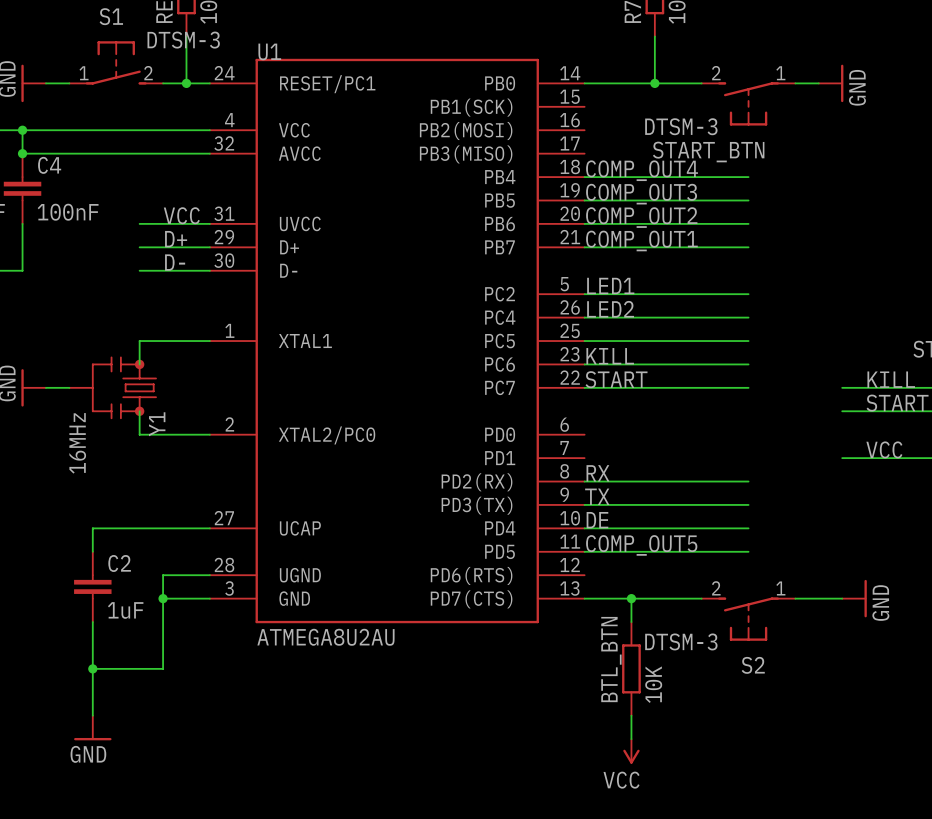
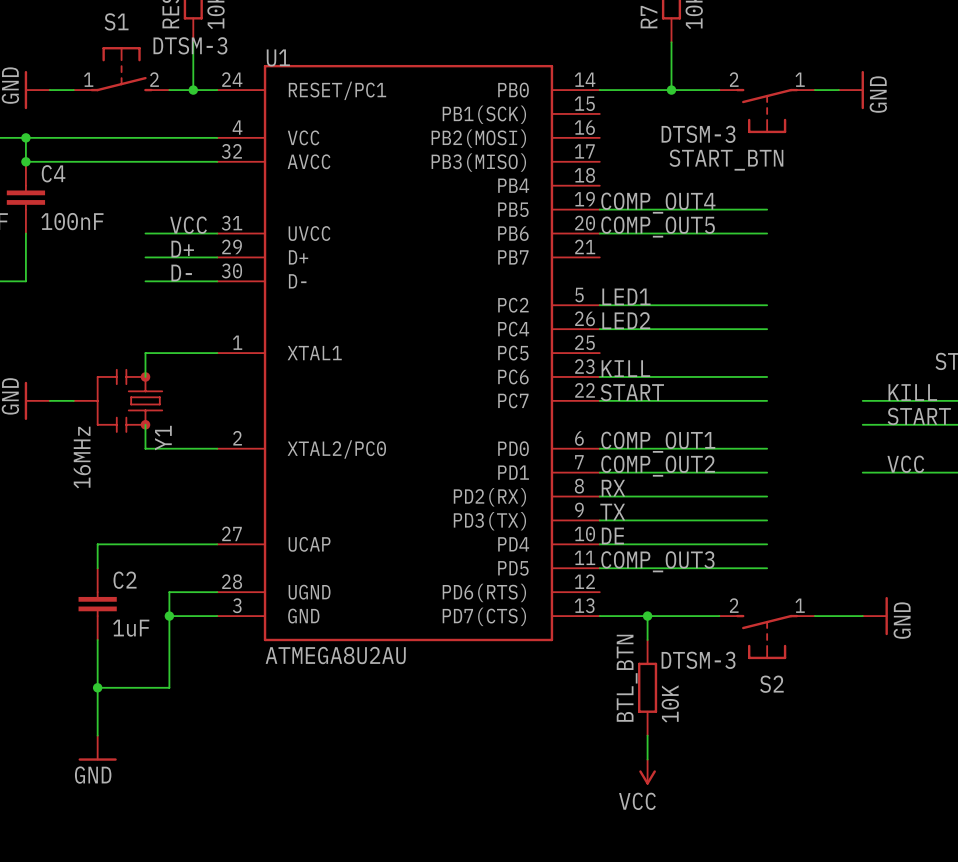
label: COMP_OUT4 (642, 170) -> none
wire: (584, 177) (748, 177) -> none
label: COMP_OUT3 (641, 194) -> COMP_OUT4 (658, 203)
label: COMP_OUT2 (641, 217) -> COMP_OUT5 (658, 227)
label position: COMP_OUT1 (641, 240) -> COMP_OUT1 (658, 442)
wire: (584, 247) (748, 247) -> (599, 472) (767, 472)
wire: (584, 341) (748, 341) -> (599, 448) (767, 448)
label: none -> COMP_OUT2 (658, 466)
label: COMP_OUT5 (641, 545) -> COMP_OUT3 (657, 561)

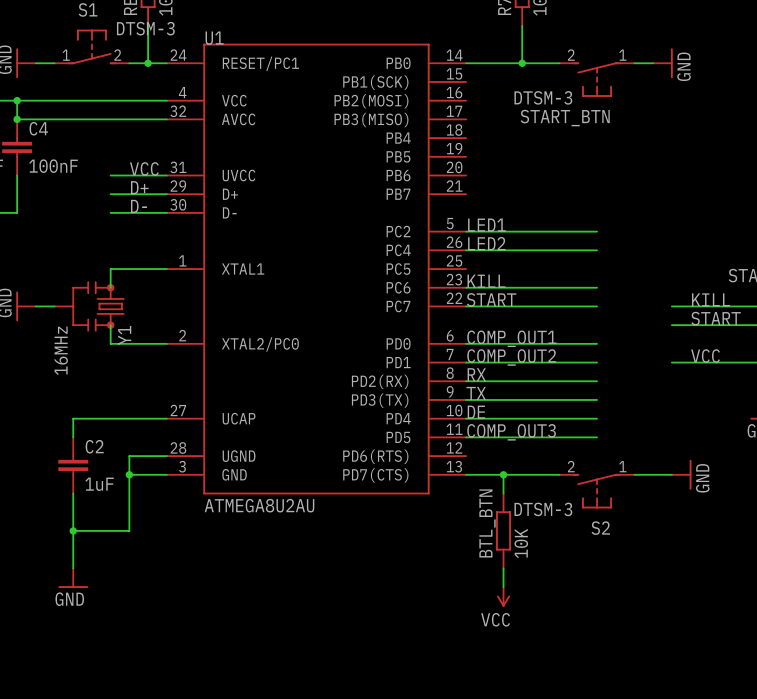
label: COMP_OUT4 (658, 203) -> none
wire: (599, 209) (767, 209) -> none
label: COMP_OUT5 (658, 227) -> none
wire: (599, 233) (767, 233) -> none

